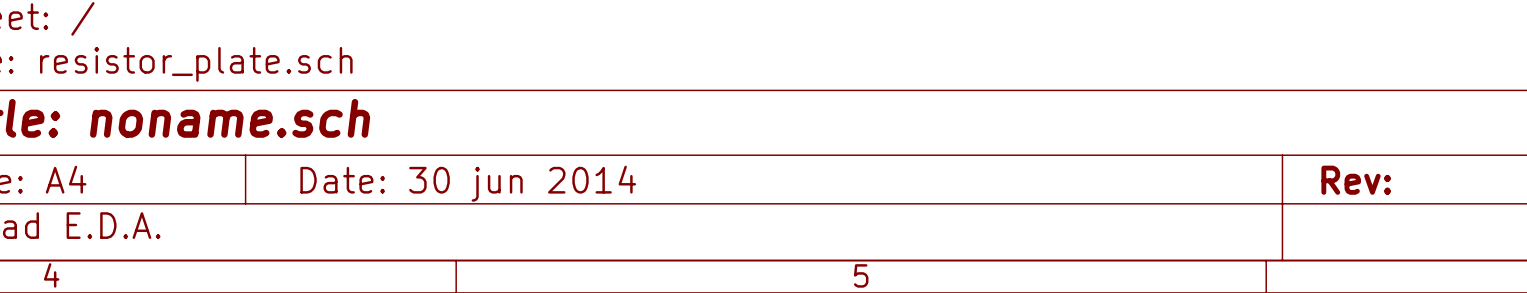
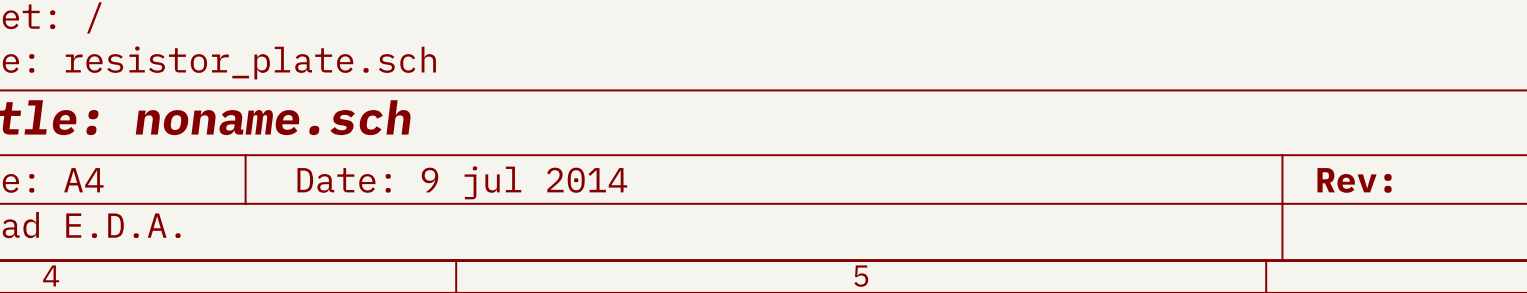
title block: Date: 30 jun 2014 (468, 183) -> Date: 9 jul 2014 (462, 182)

